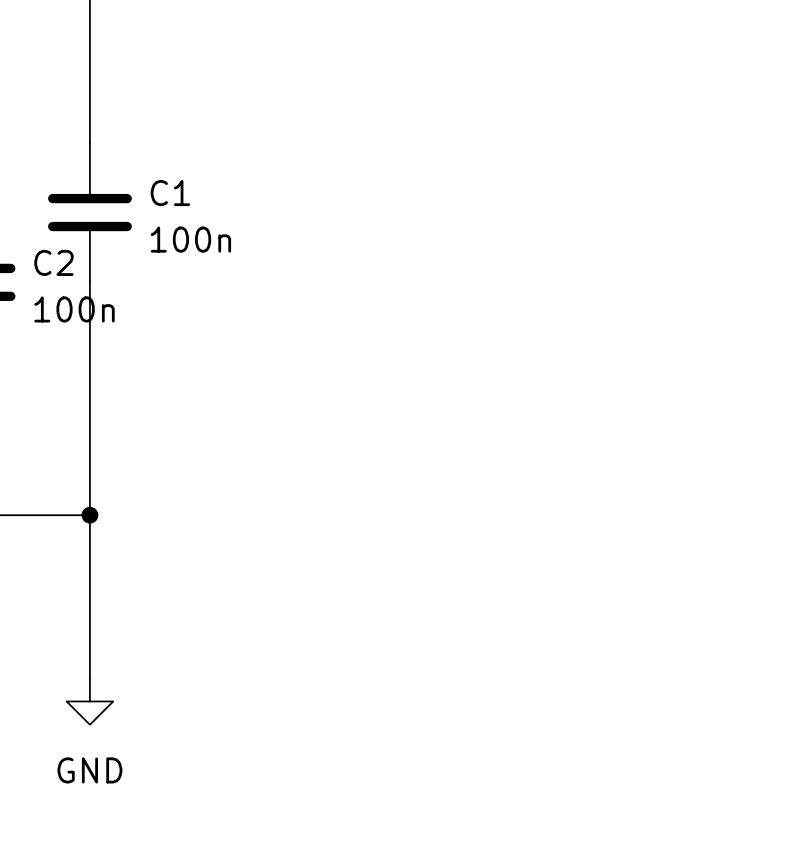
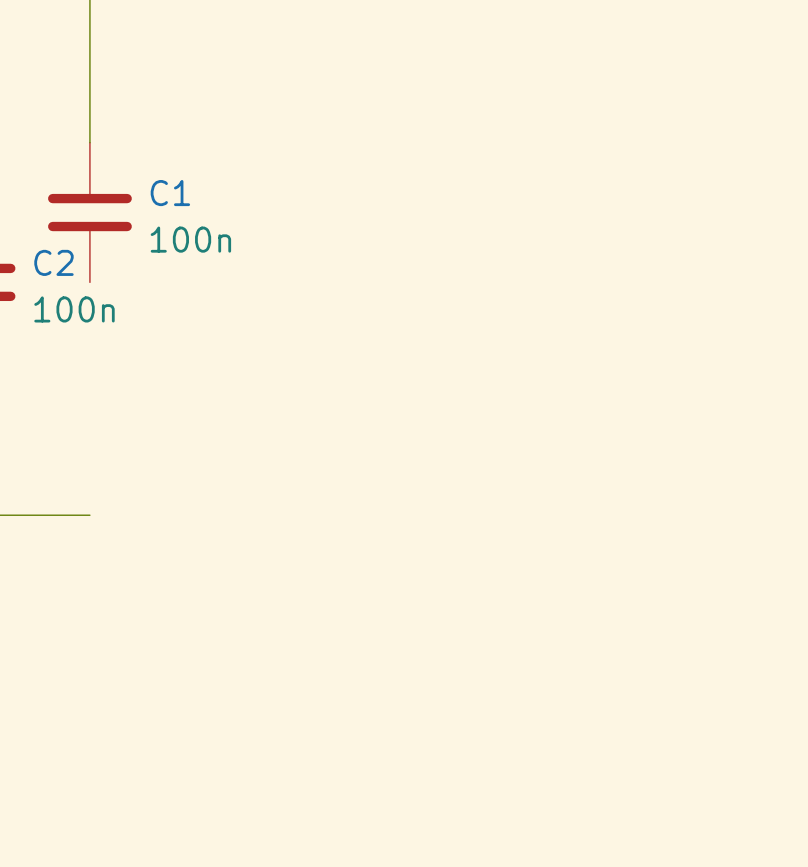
wire: (89, 282) (89, 678) -> none
junction: (89, 515) -> none
power symbol: GND (89, 701) -> none

